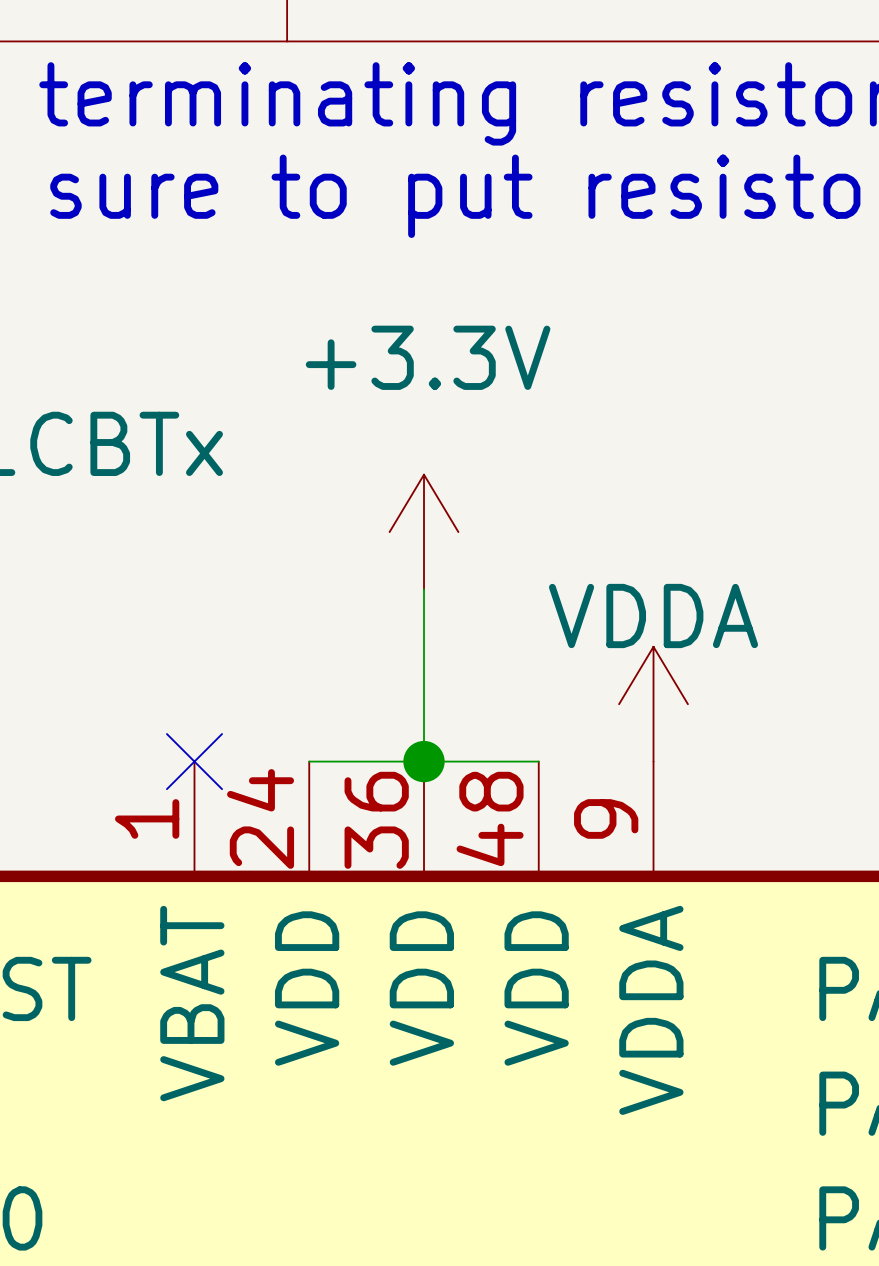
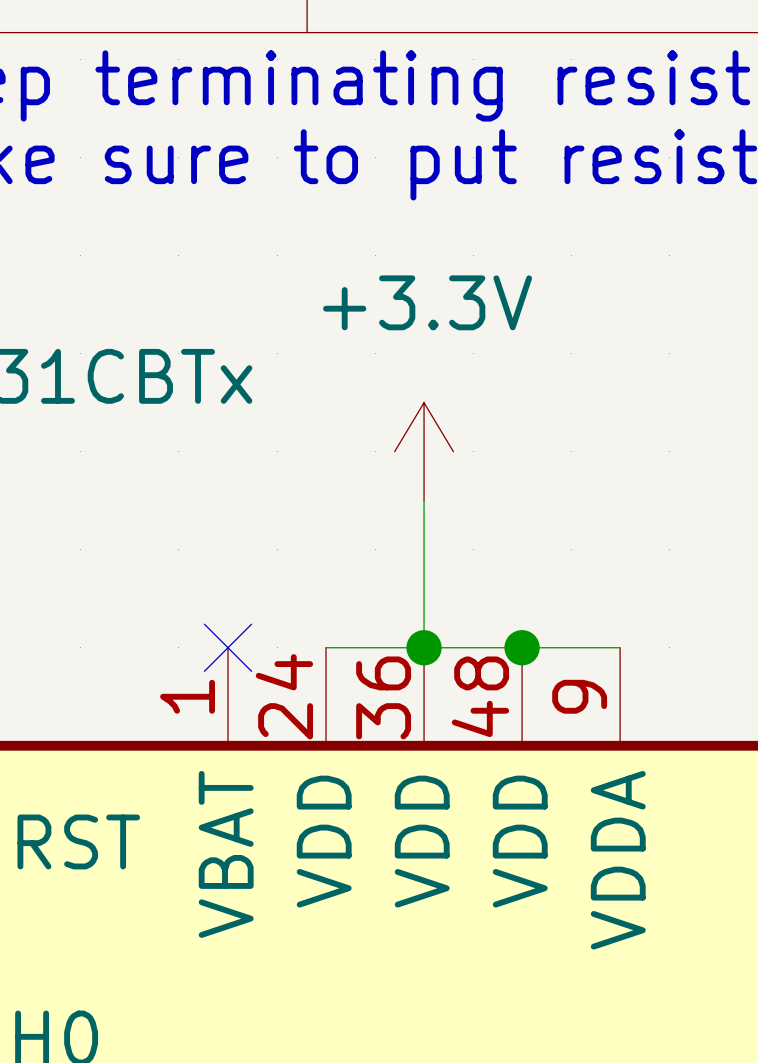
power symbol: VDDA (653, 704) -> none
wire: none -> (522, 647) (620, 647)
junction: none -> (522, 647)

